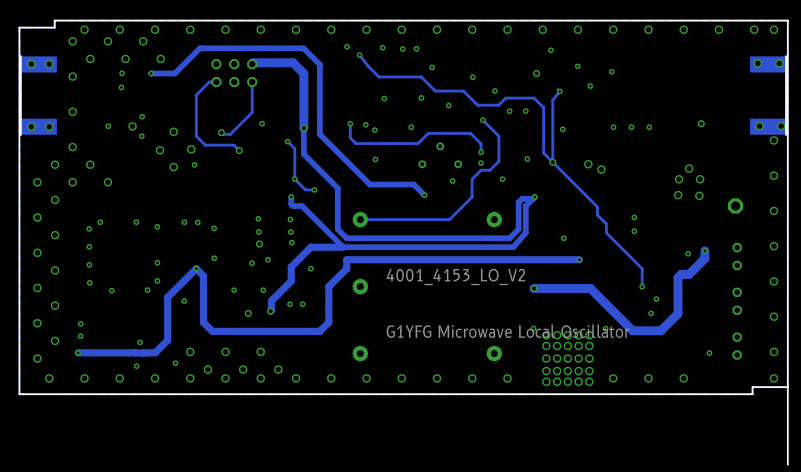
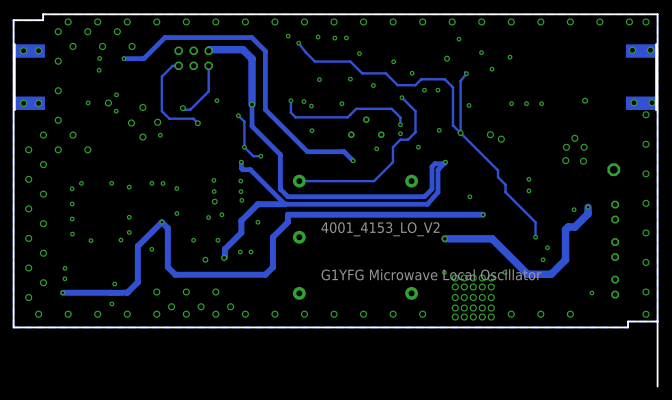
via: (175, 363) -> none

